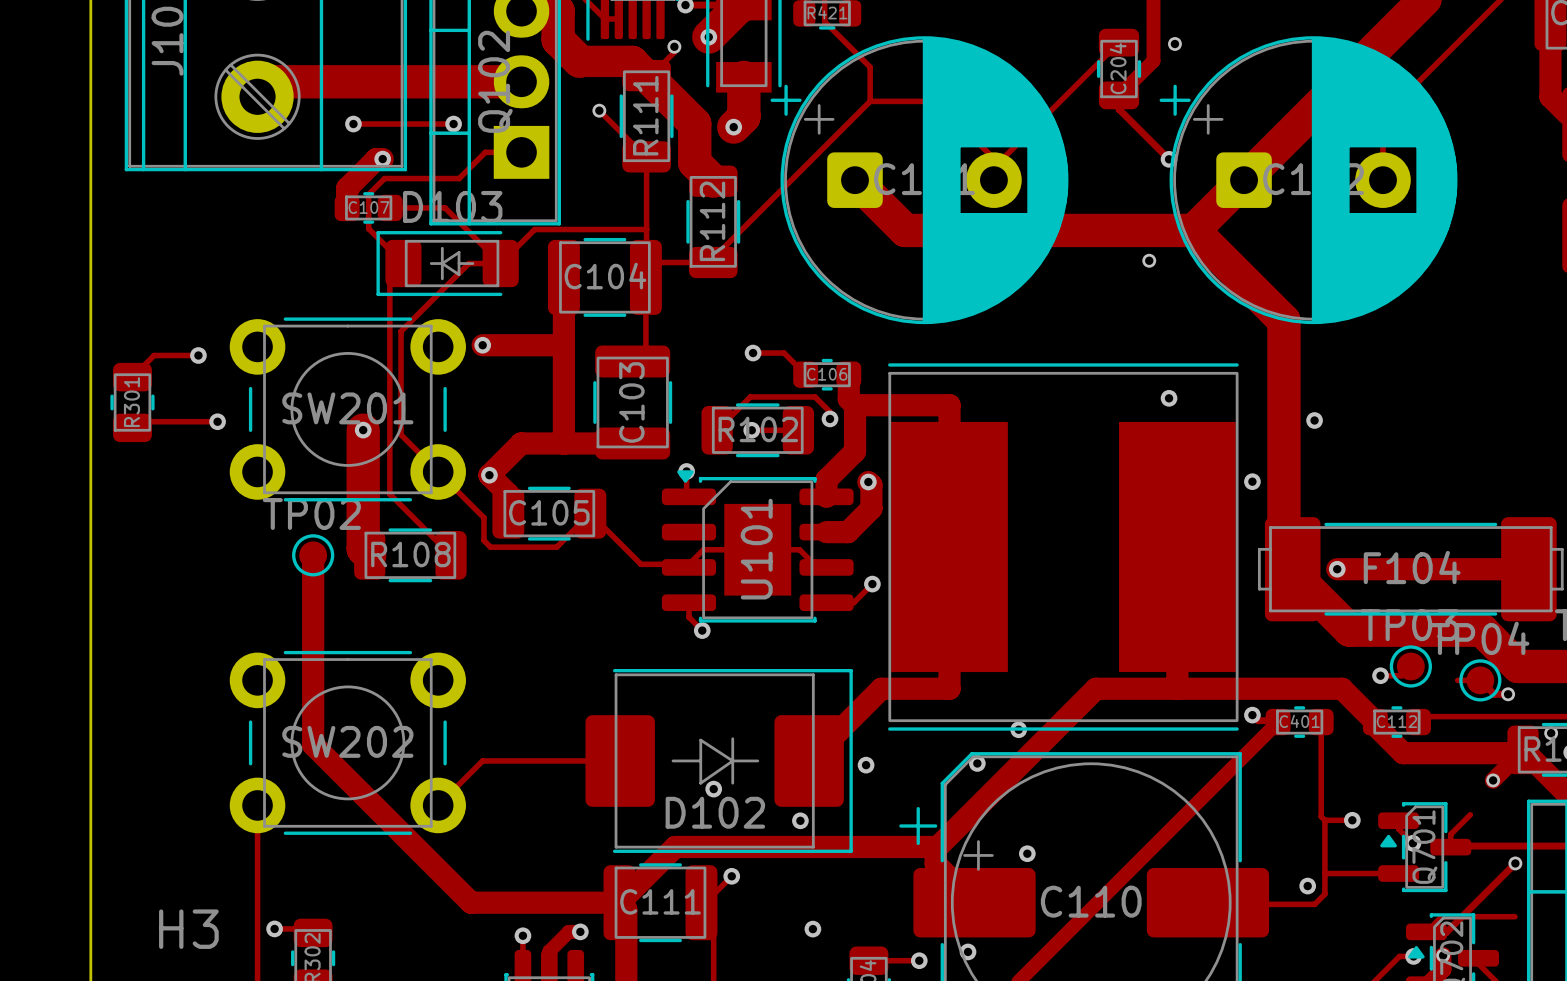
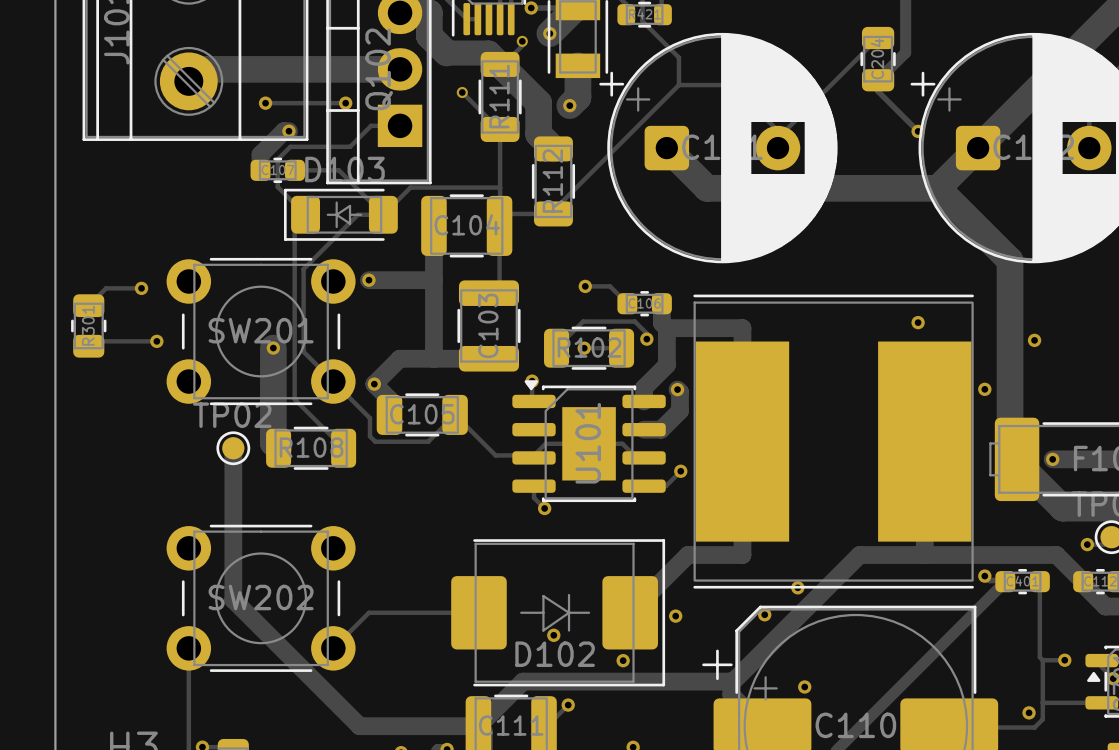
via: (1174, 44) -> none
via: (1149, 260) -> none

